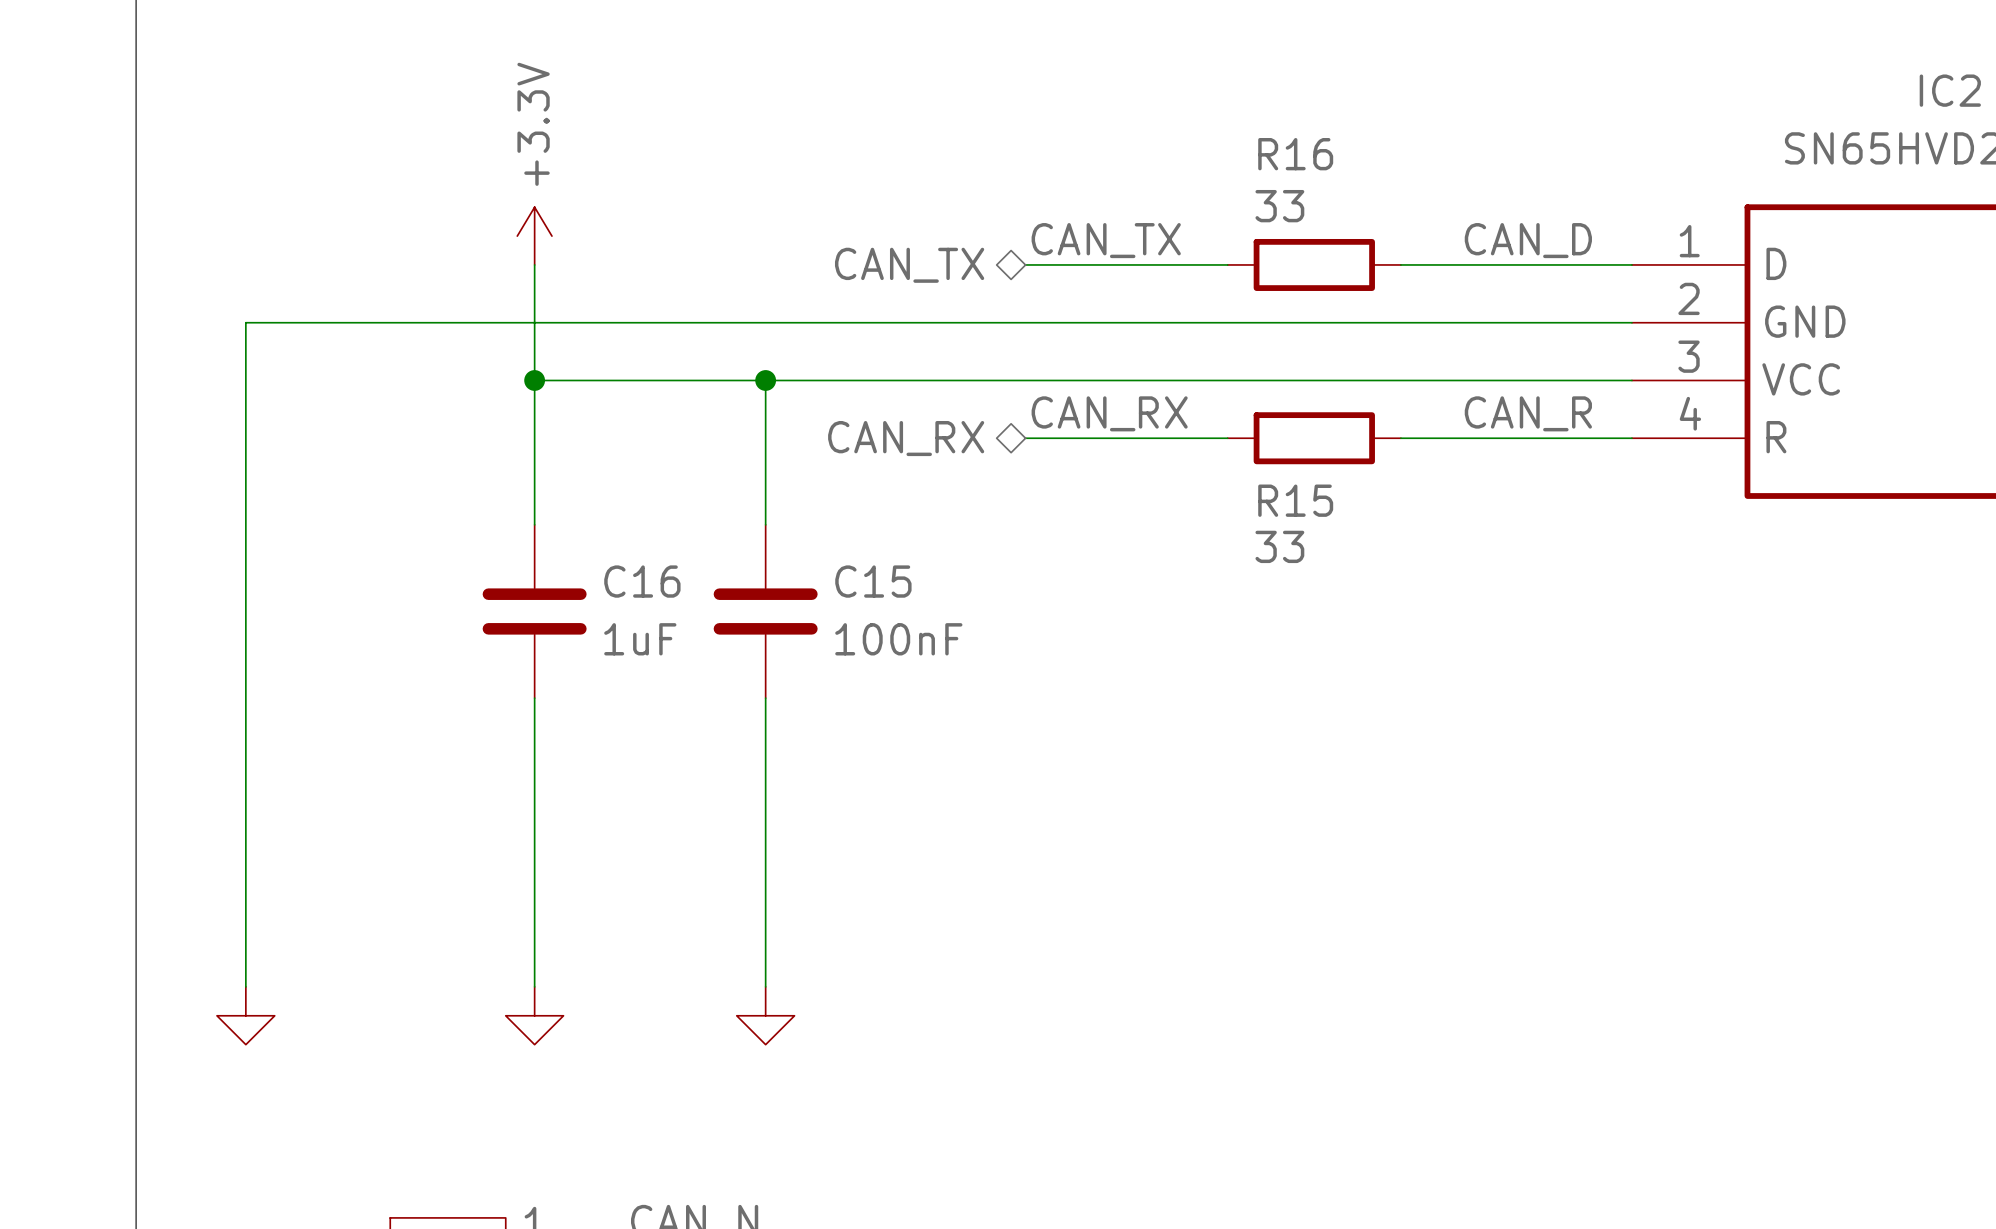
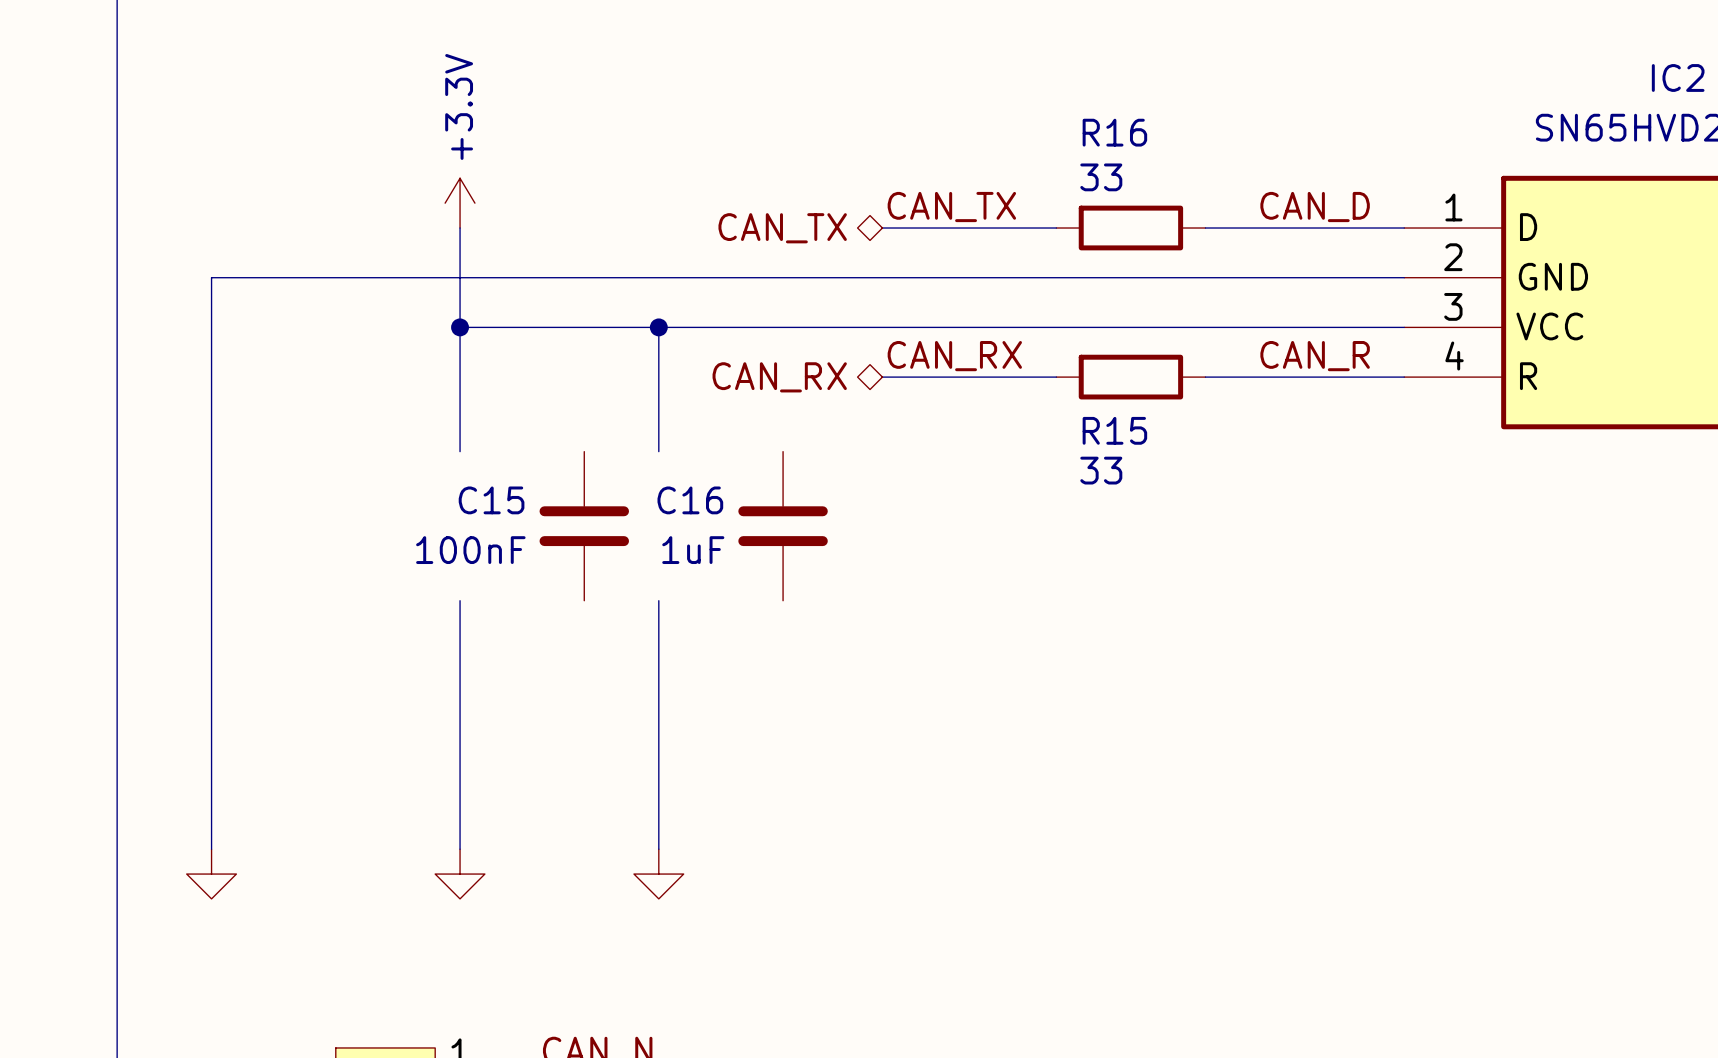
C16 name position: C16 (642, 581) -> C16 (690, 500)
C15 name position: C15 (873, 581) -> C15 (491, 500)
C16 position: (534, 611) -> (783, 526)
C15 position: (765, 611) -> (584, 526)
C16 value position: 1uF (640, 639) -> 1uF (693, 550)
C15 value position: 100nF (898, 639) -> 100nF (470, 550)

